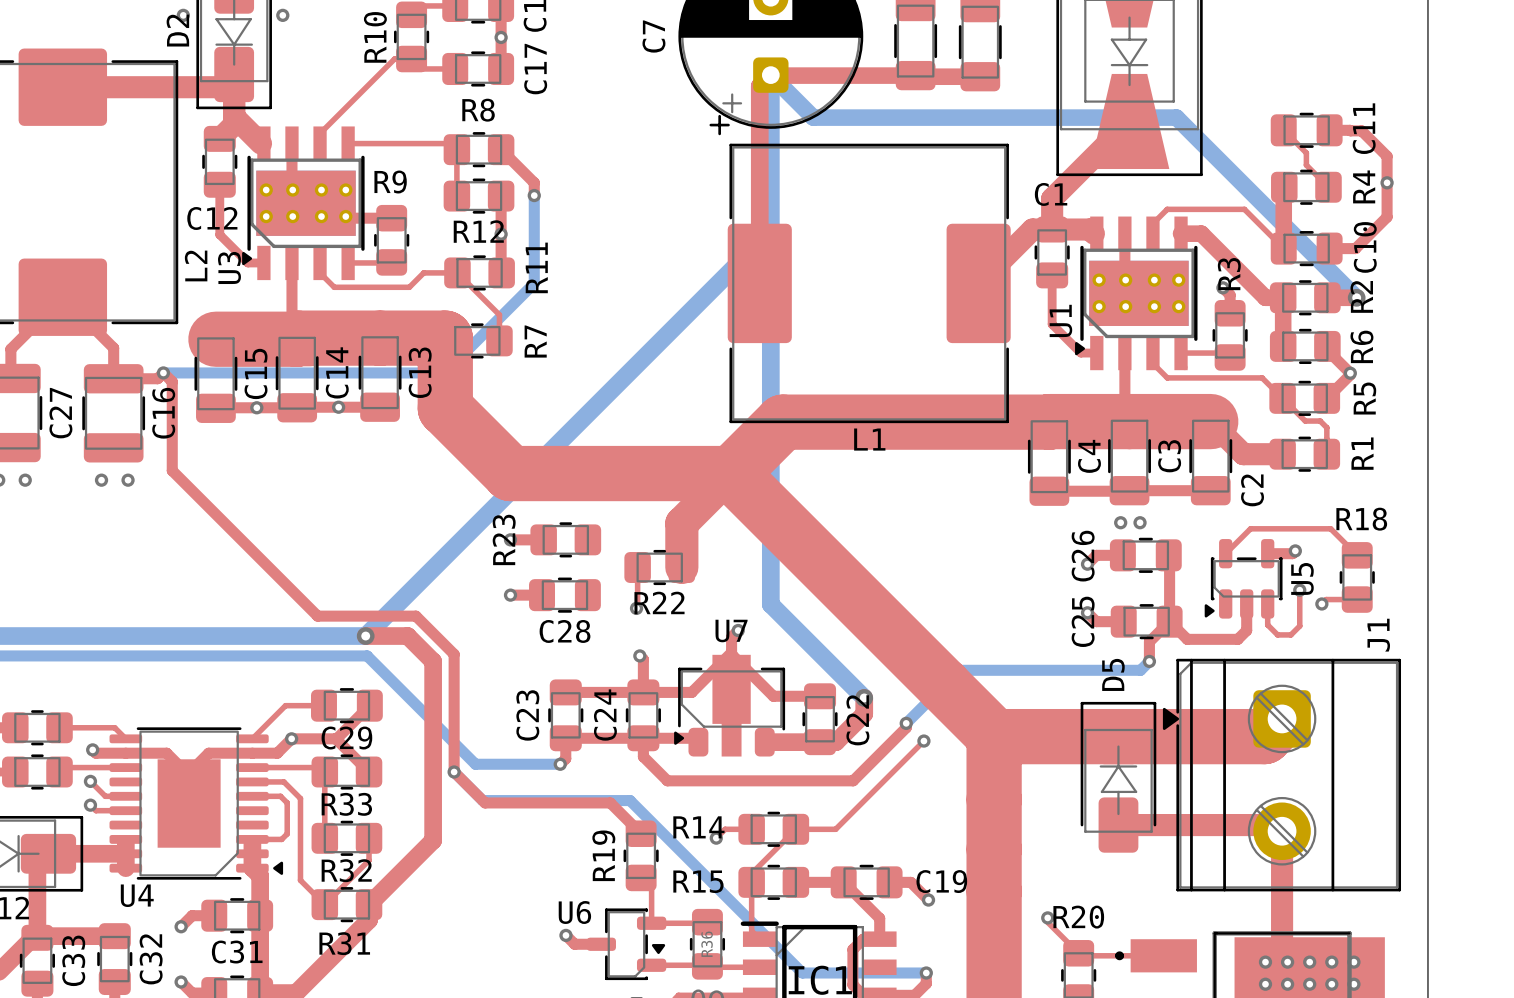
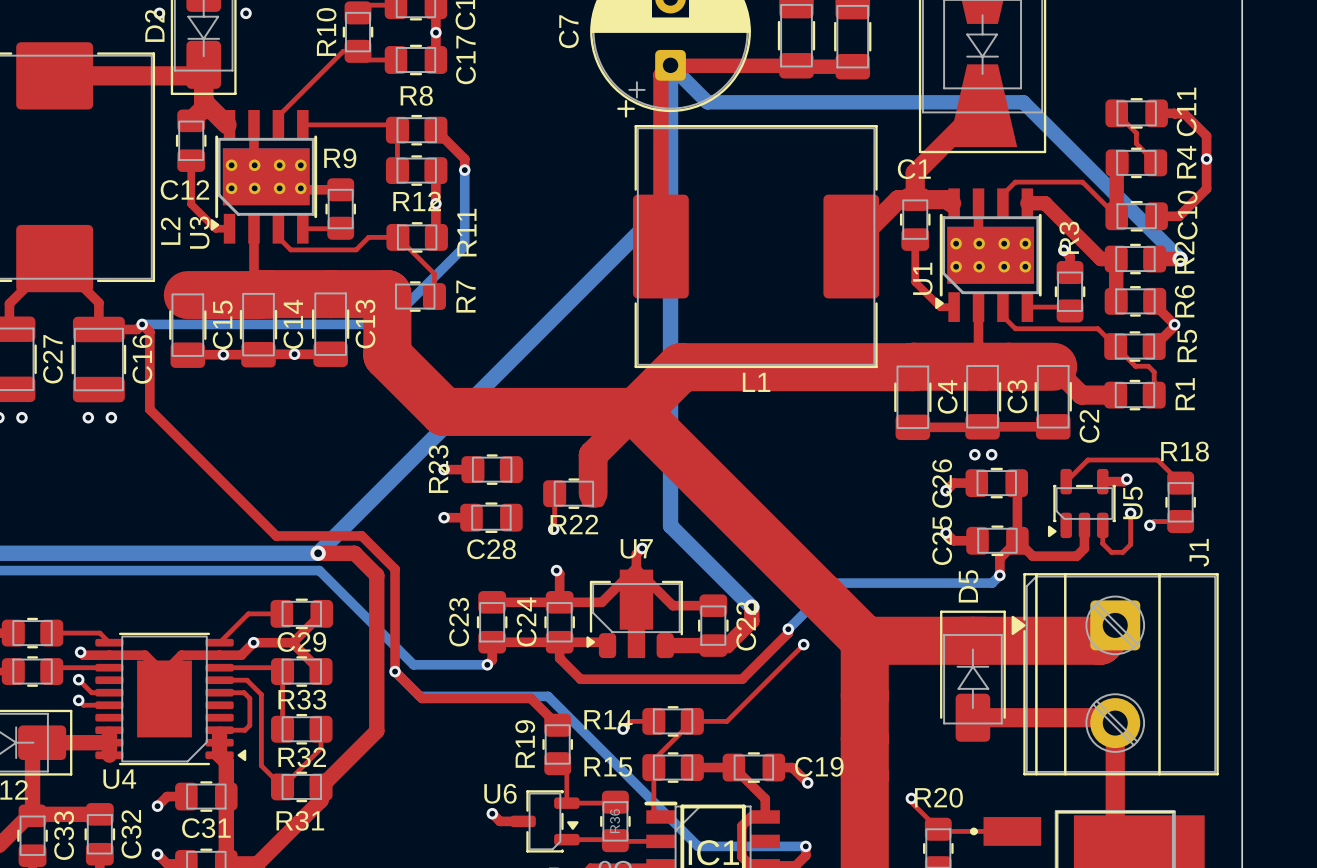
via: (1265, 962) -> none
via: (1287, 962) -> none
via: (1309, 962) -> none
via: (1331, 962) -> none
via: (1353, 962) -> none
via: (1265, 984) -> none
via: (1287, 984) -> none
via: (1309, 984) -> none
via: (1331, 984) -> none
via: (1353, 984) -> none

